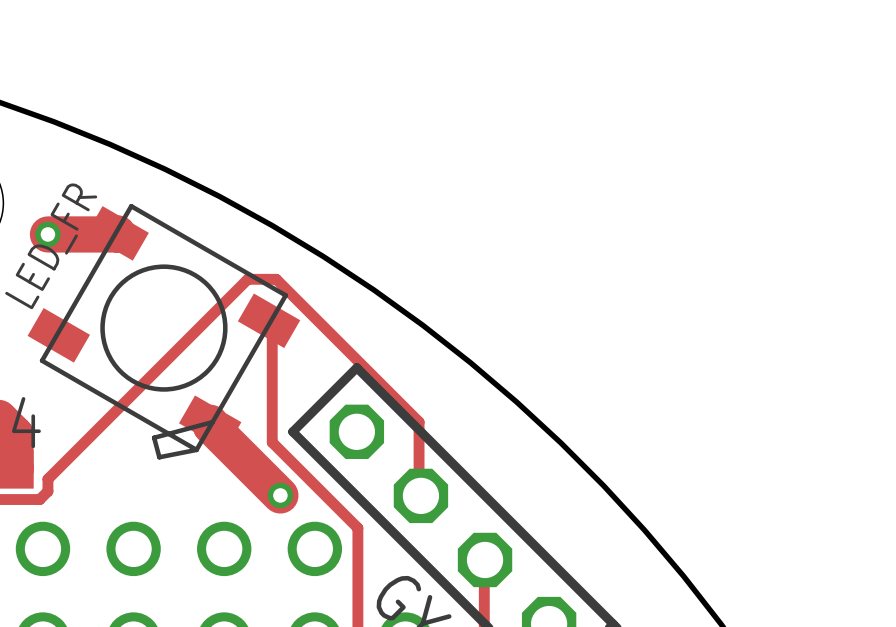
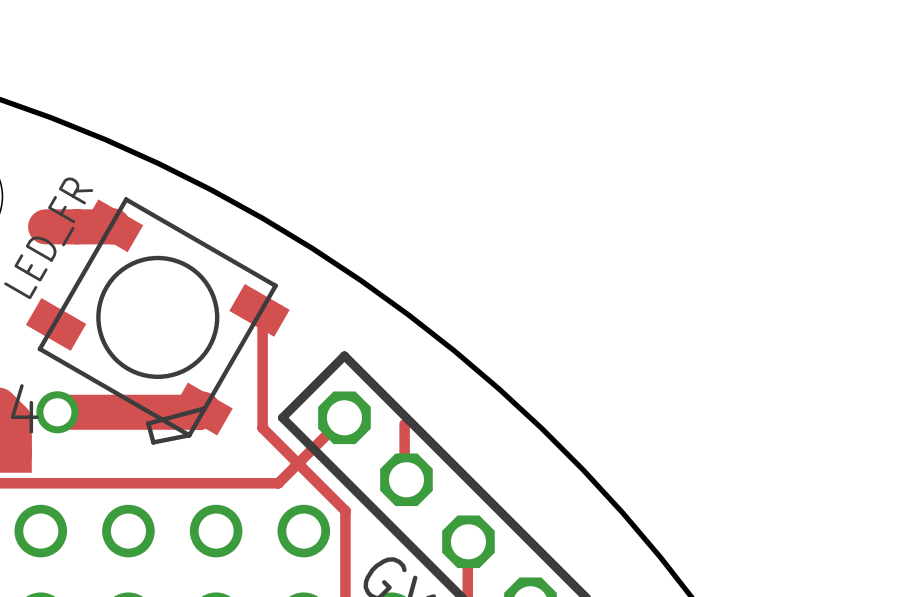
via: (47, 234) -> none
track: (210, 422) (211, 426) (280, 495) -> (202, 409) (199, 412) (57, 412)
via: none -> (57, 412)
track: (419, 438) (419, 422) (276, 279) (247, 279) (47, 479) (47, 491) (39, 499) -> (344, 417) (278, 483) (37, 483)
via: (280, 495) -> none

